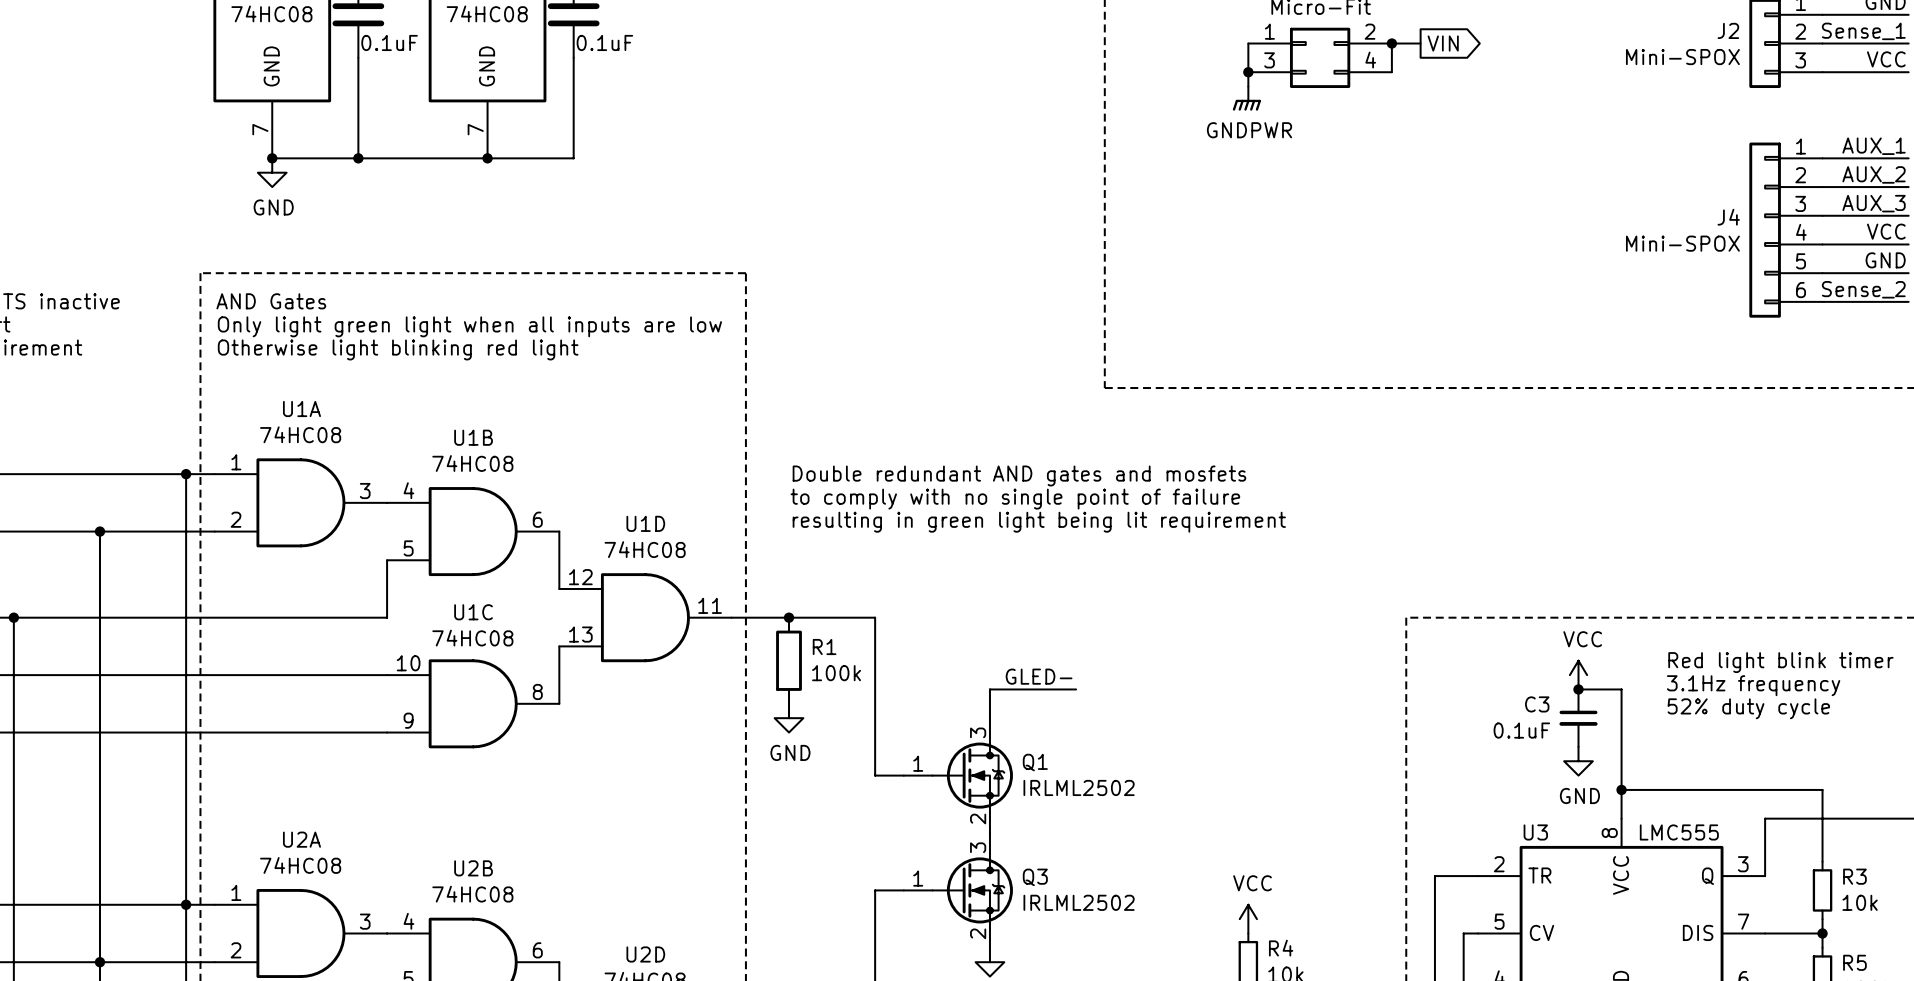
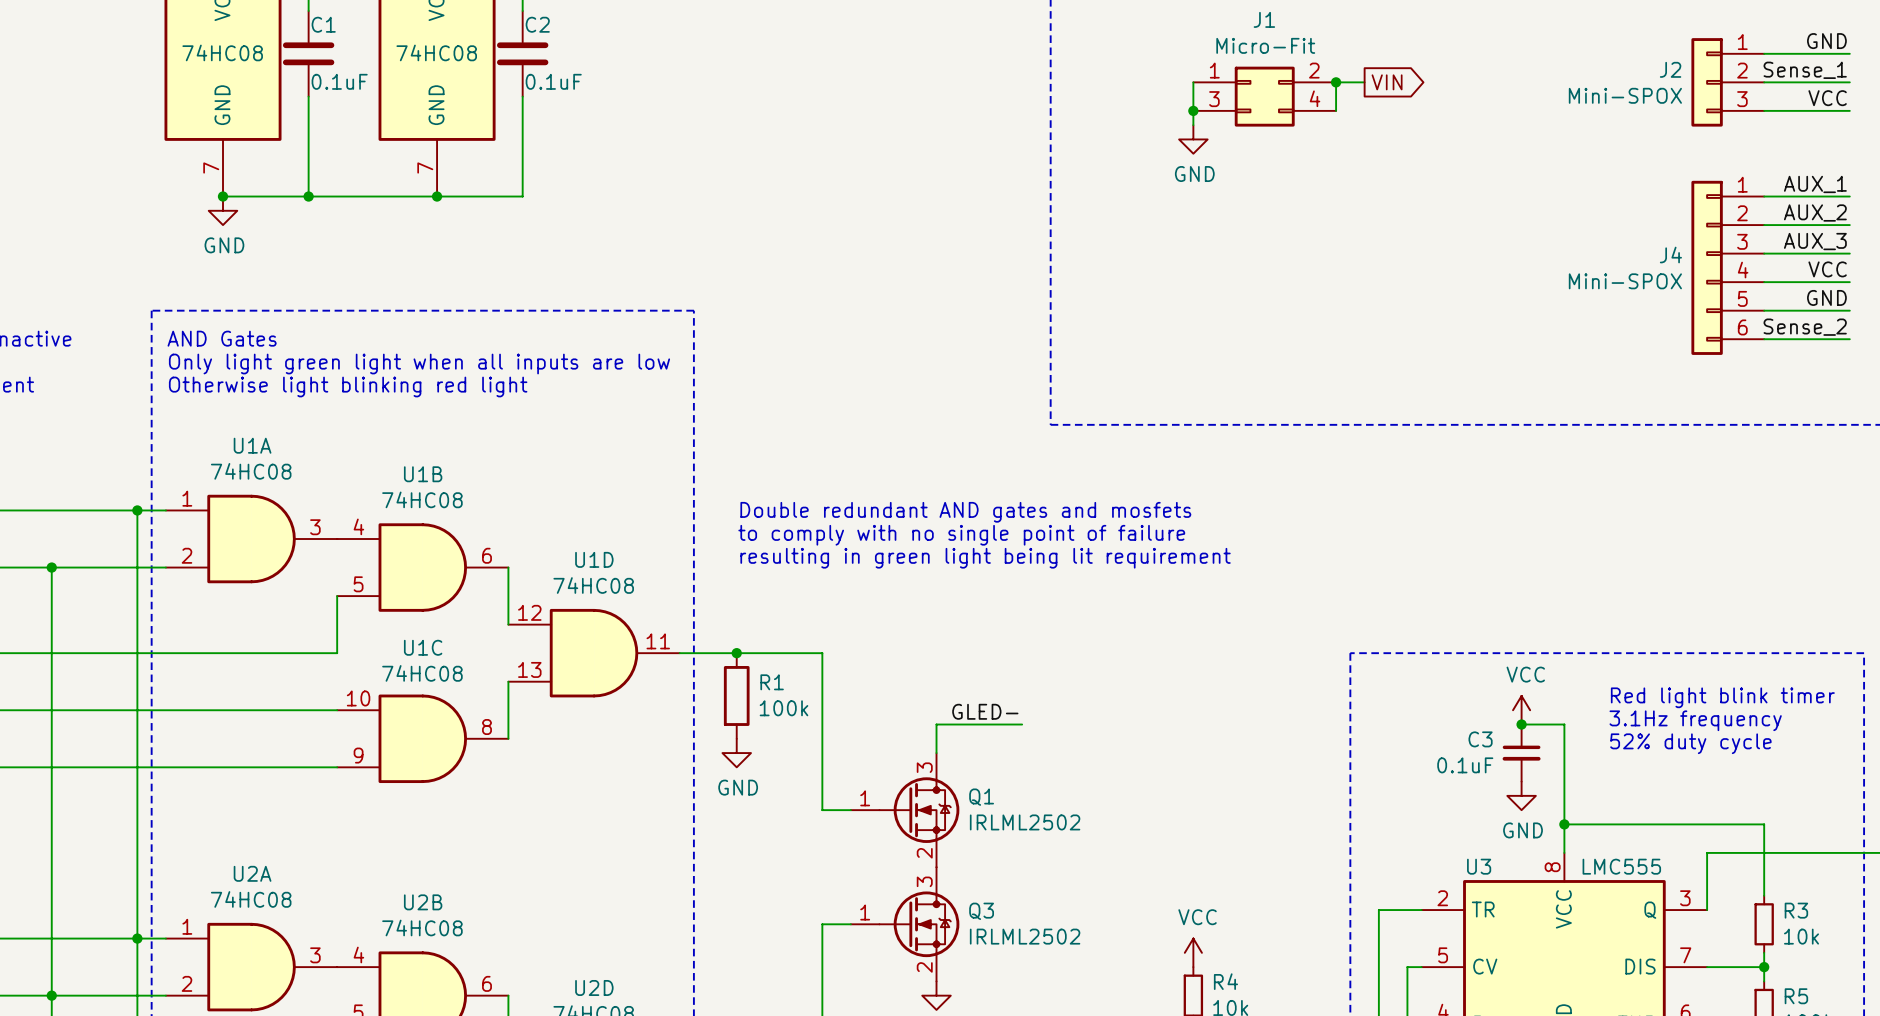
power symbol: GNDPWR (1246, 98) -> GND (1193, 139)

